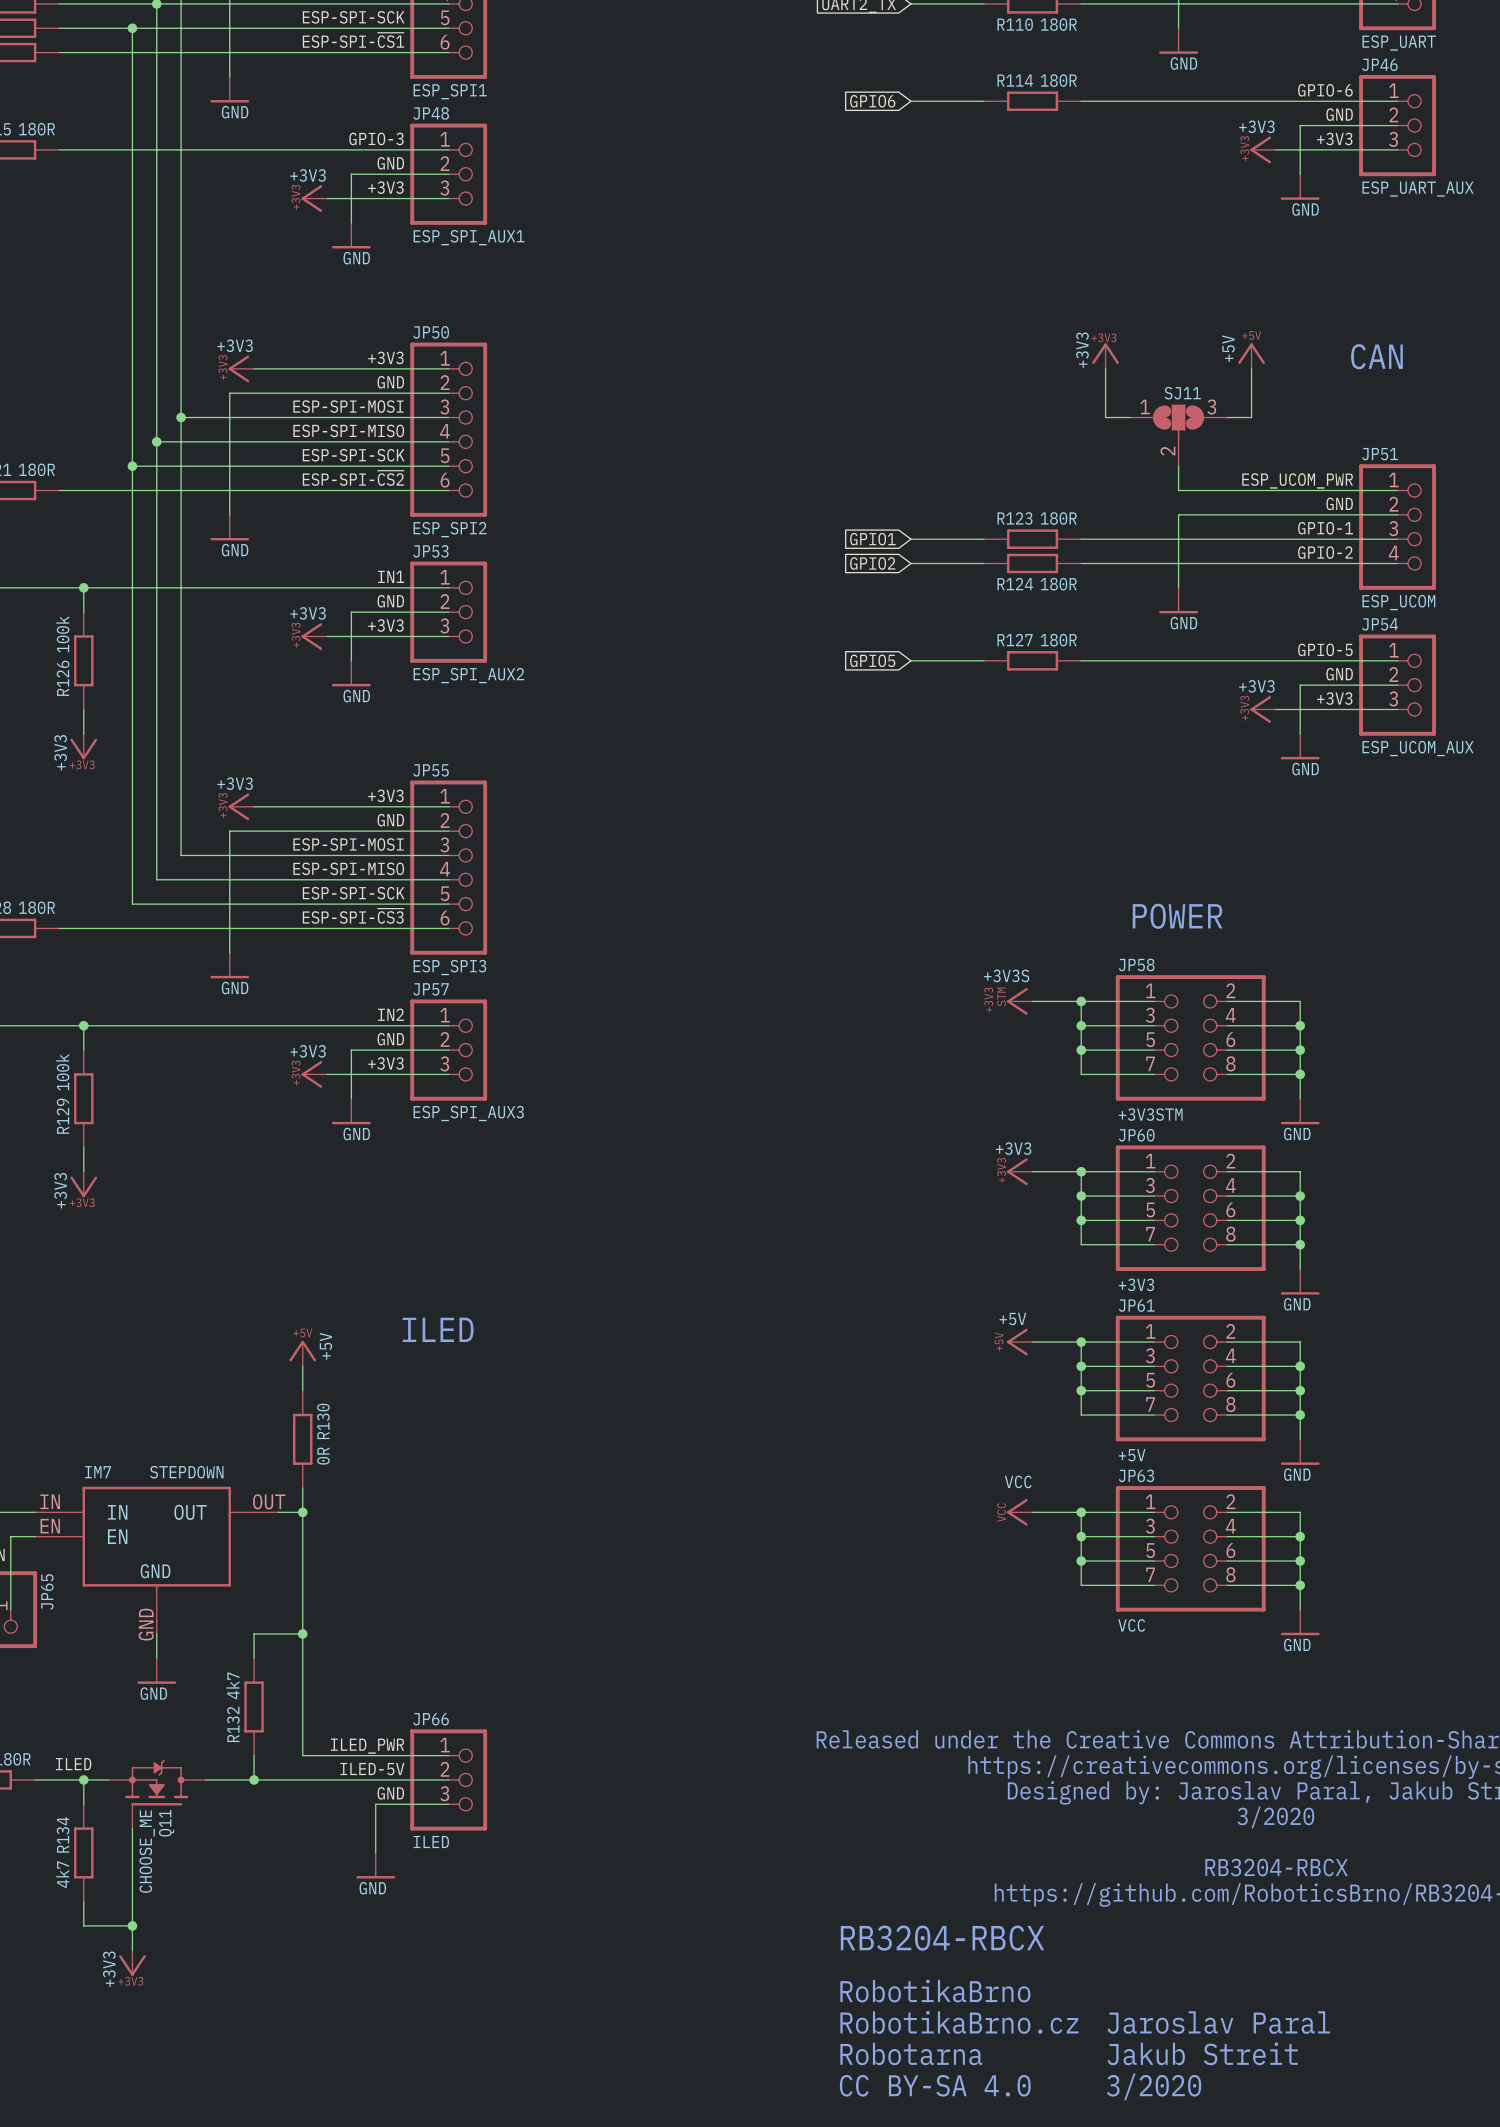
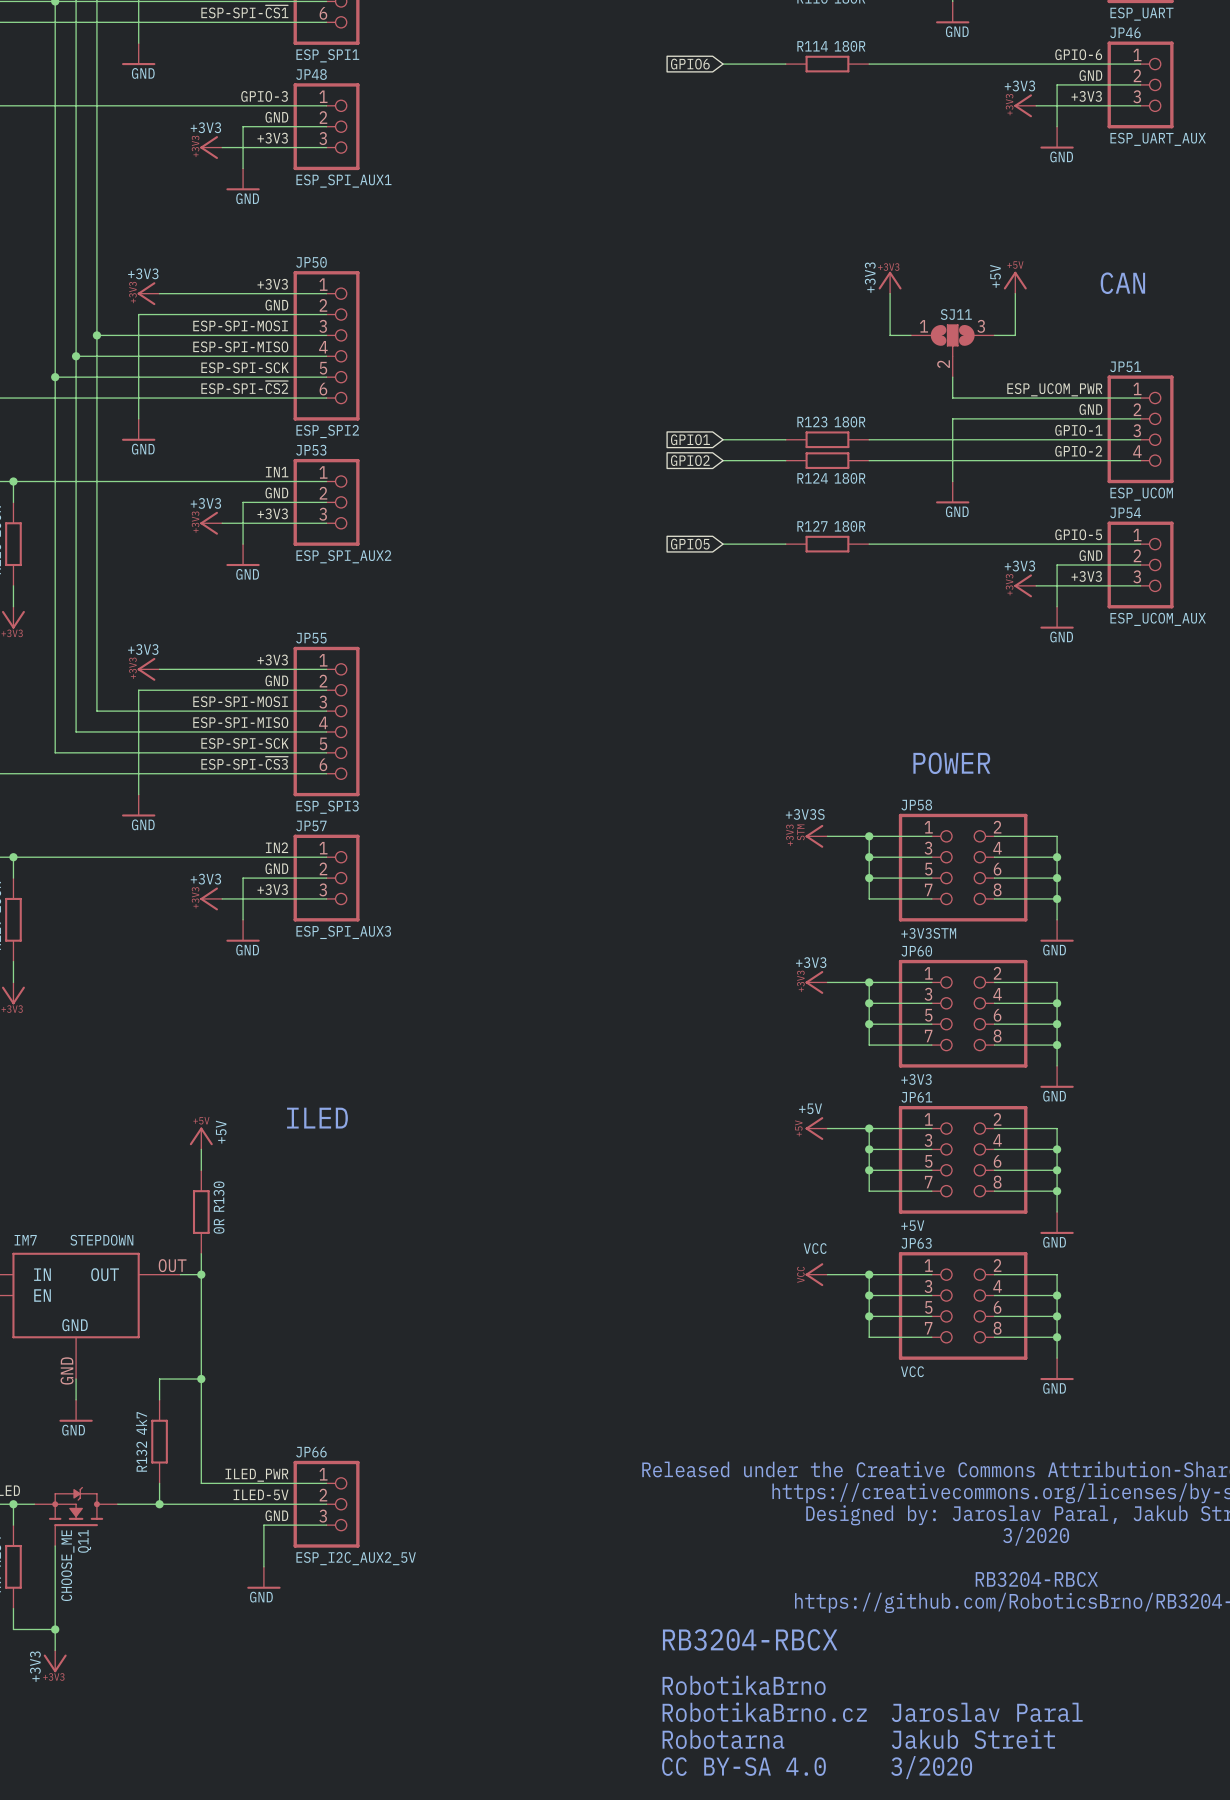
JP66 value: ILED (431, 1842) -> ESP_I2C_AUX2_5V (356, 1558)

